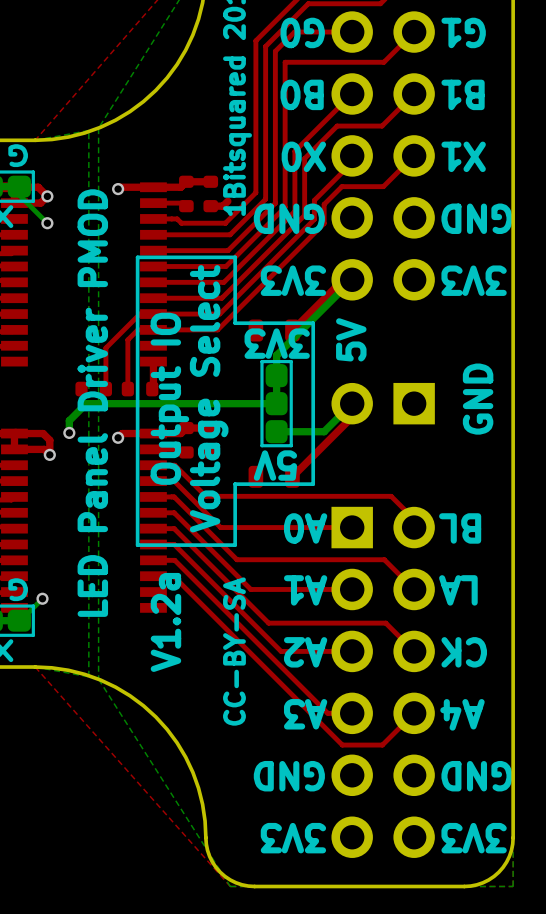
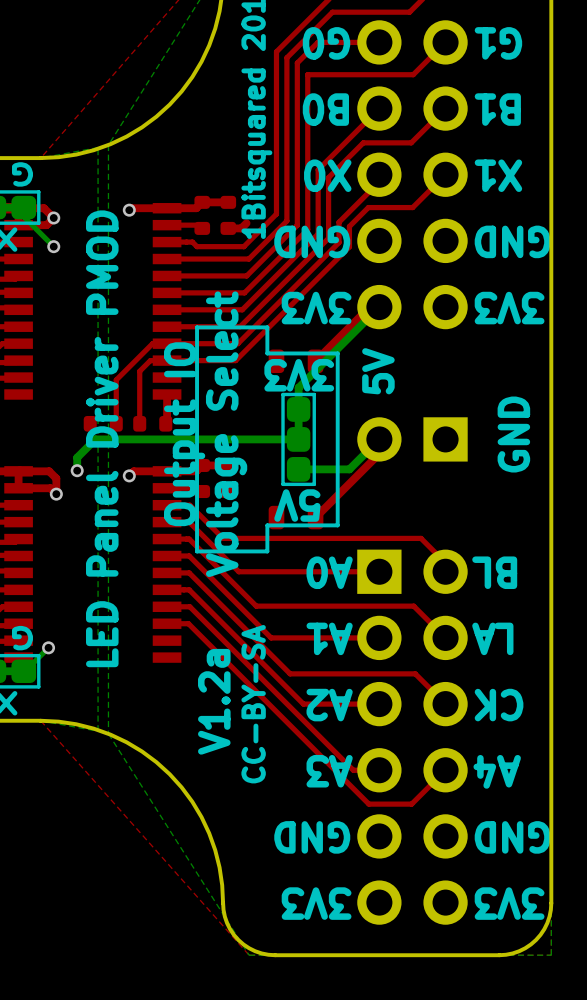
line: (247, 323) (235, 323) (235, 257) (137, 257) (137, 545) (235, 545) (235, 484) (247, 484) -> (267, 353) (267, 327) (197, 327) (197, 551) (267, 551) (267, 525)
text position: V1.2a (165, 622) -> V1.2a (214, 701)

